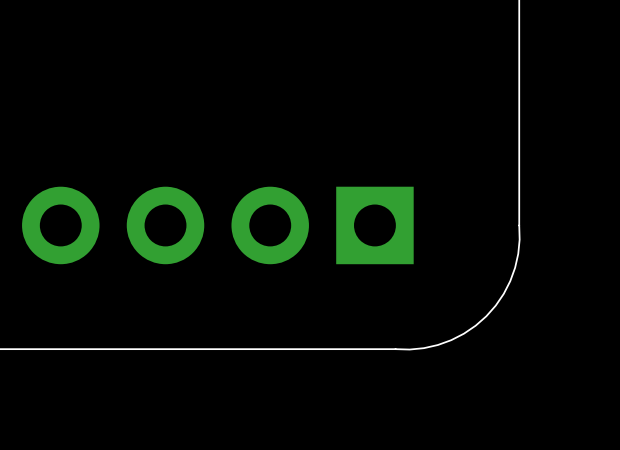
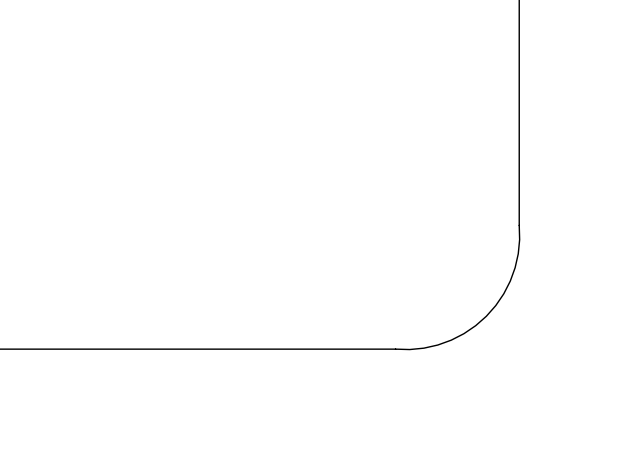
part: (217, 225) -> none

